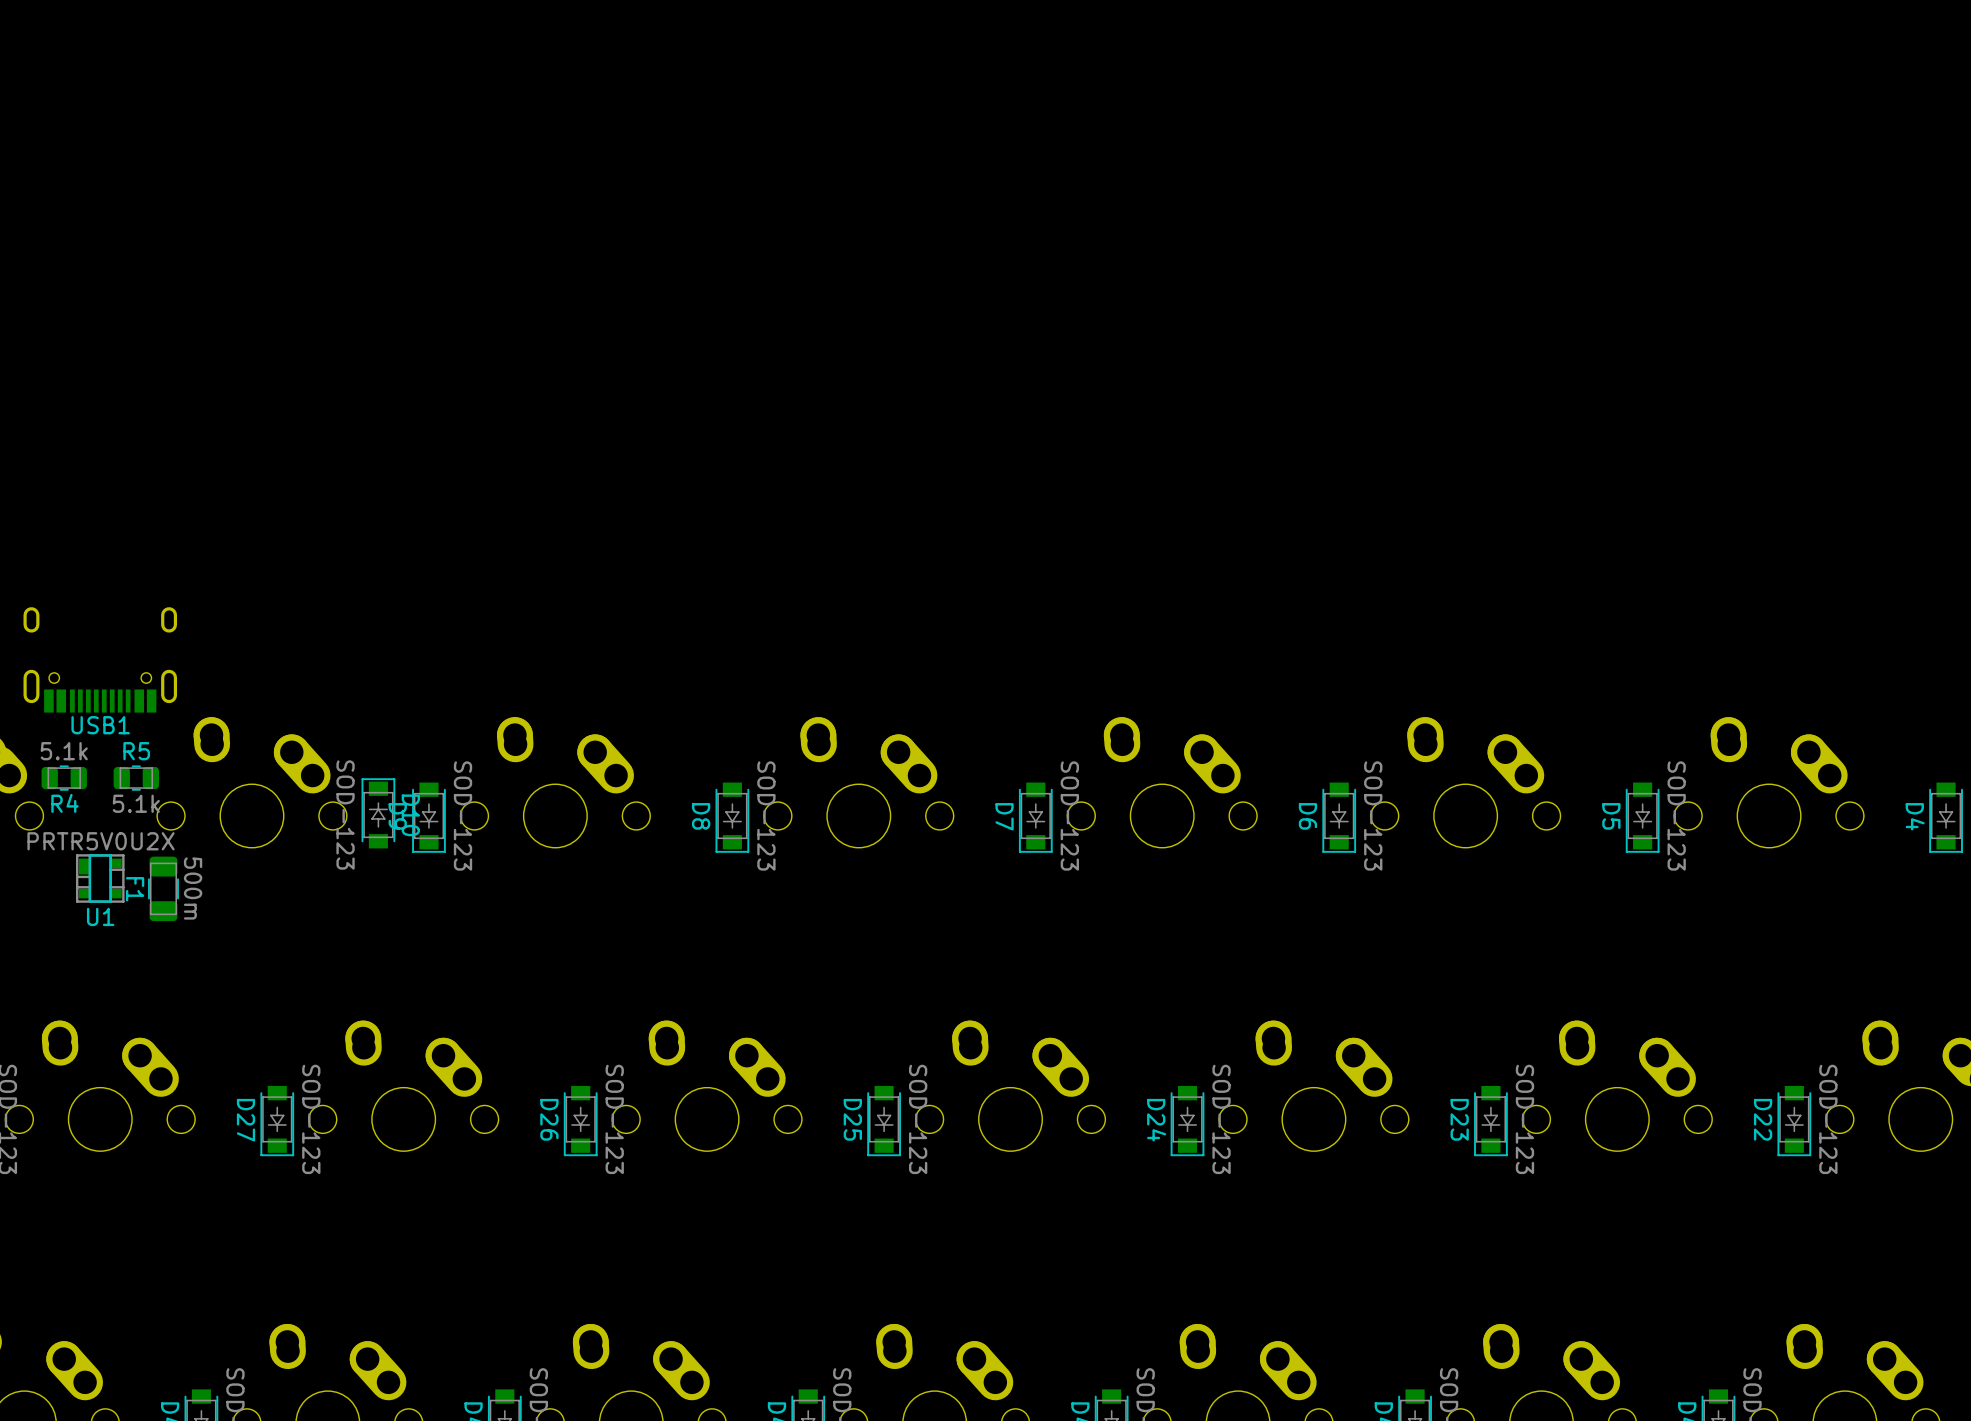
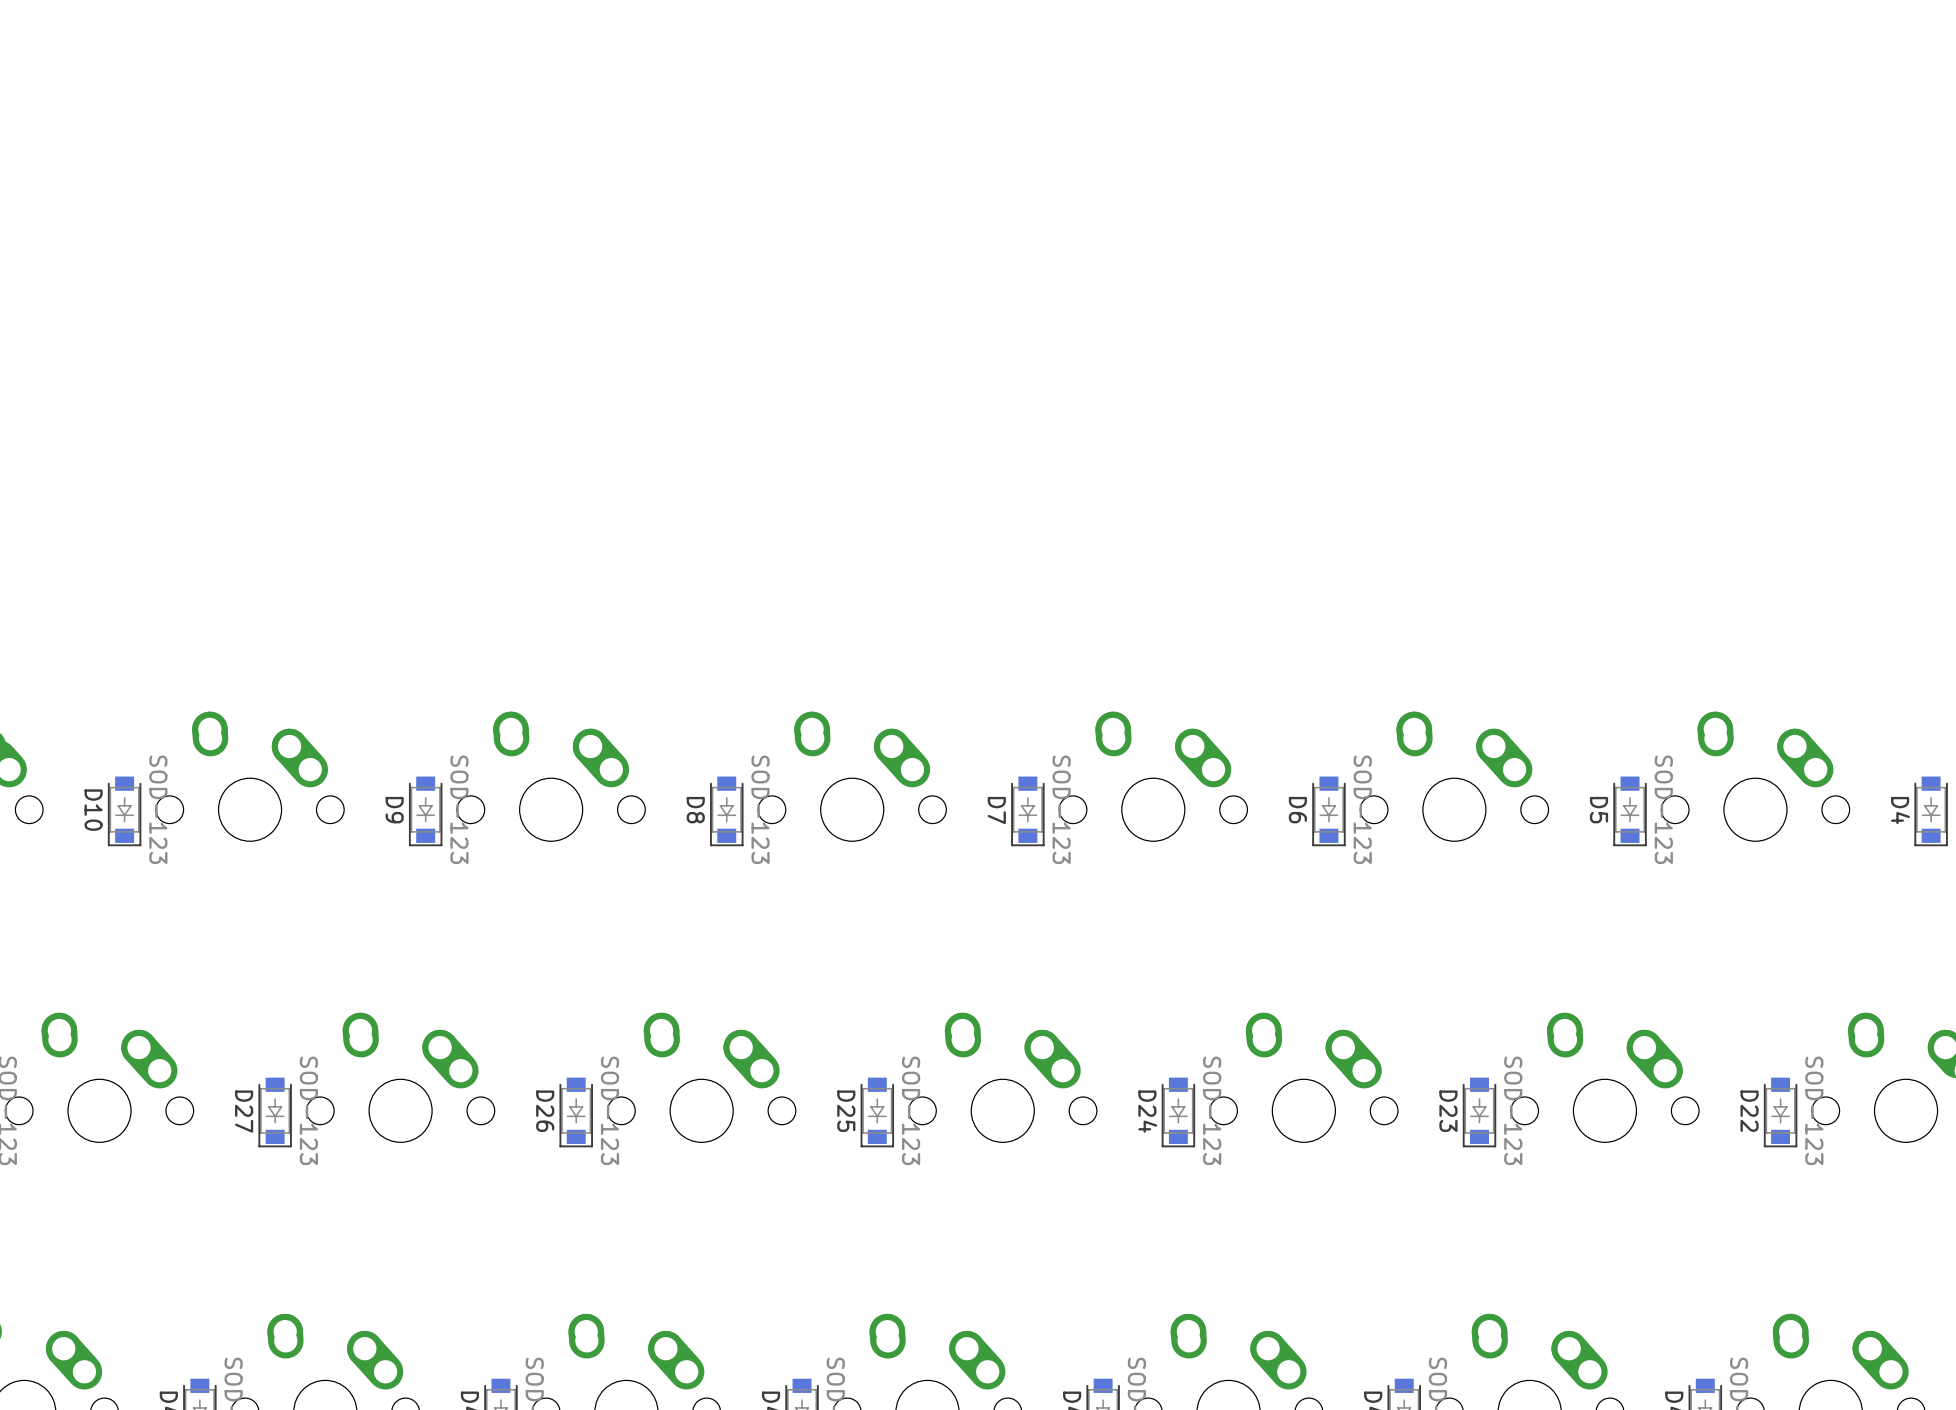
USB1: (100, 659) -> none
R4: 5.1k (64, 778) -> none
R5: 5.1k (136, 778) -> none
D10 rotation: 0° (378, 813) -> 180° (124, 811)
D10 position: (378, 813) -> (124, 811)
U1: PRTR5V0U2X (100, 878) -> none
F1: 500m (163, 888) -> none

